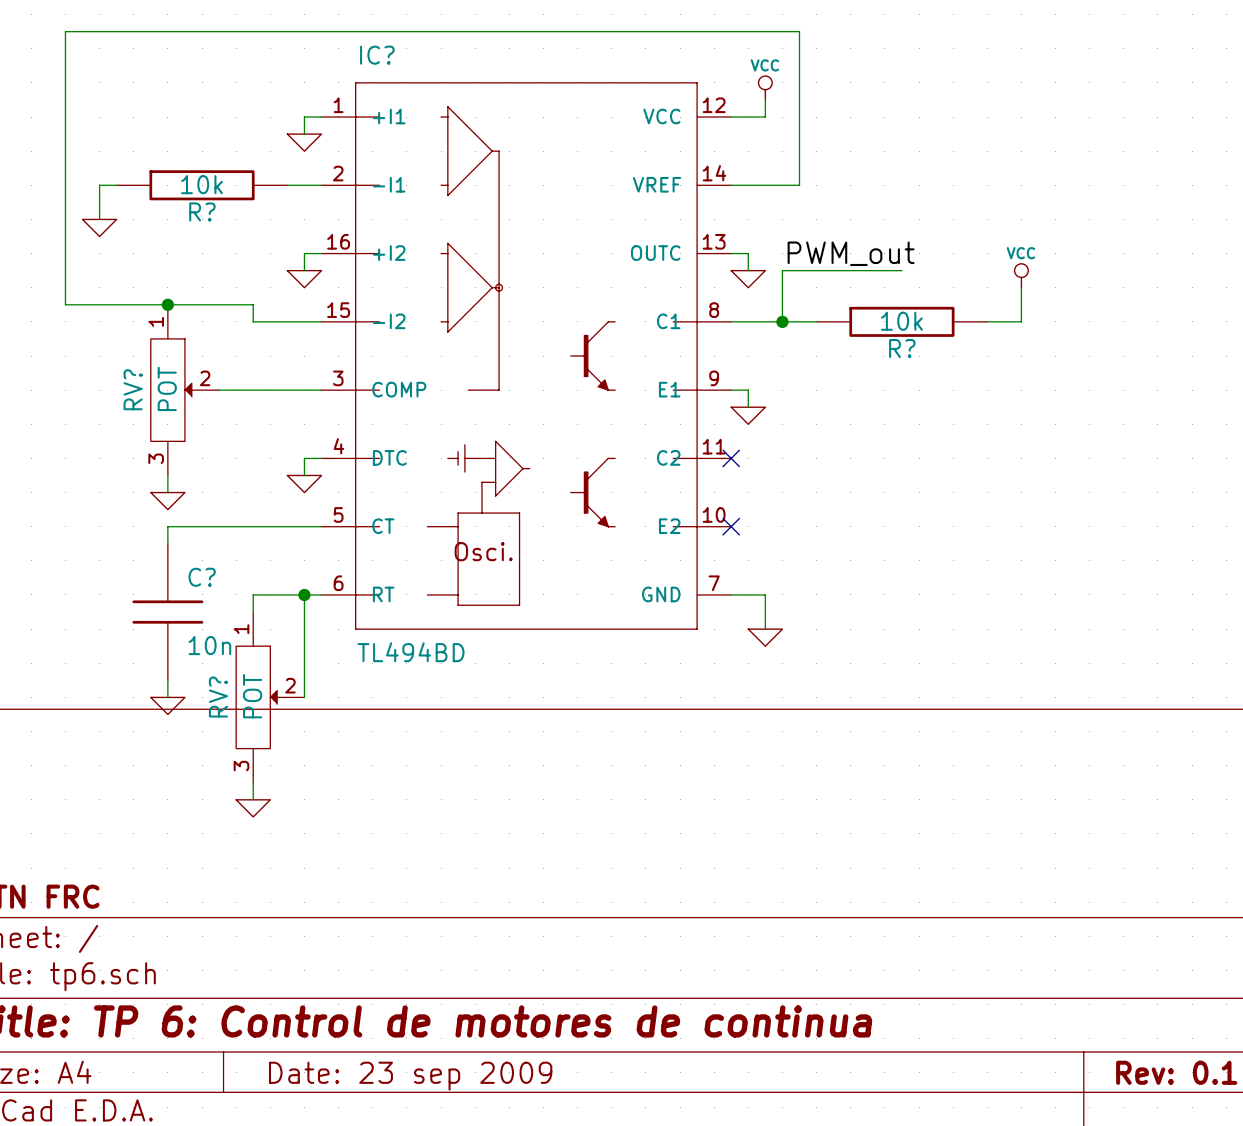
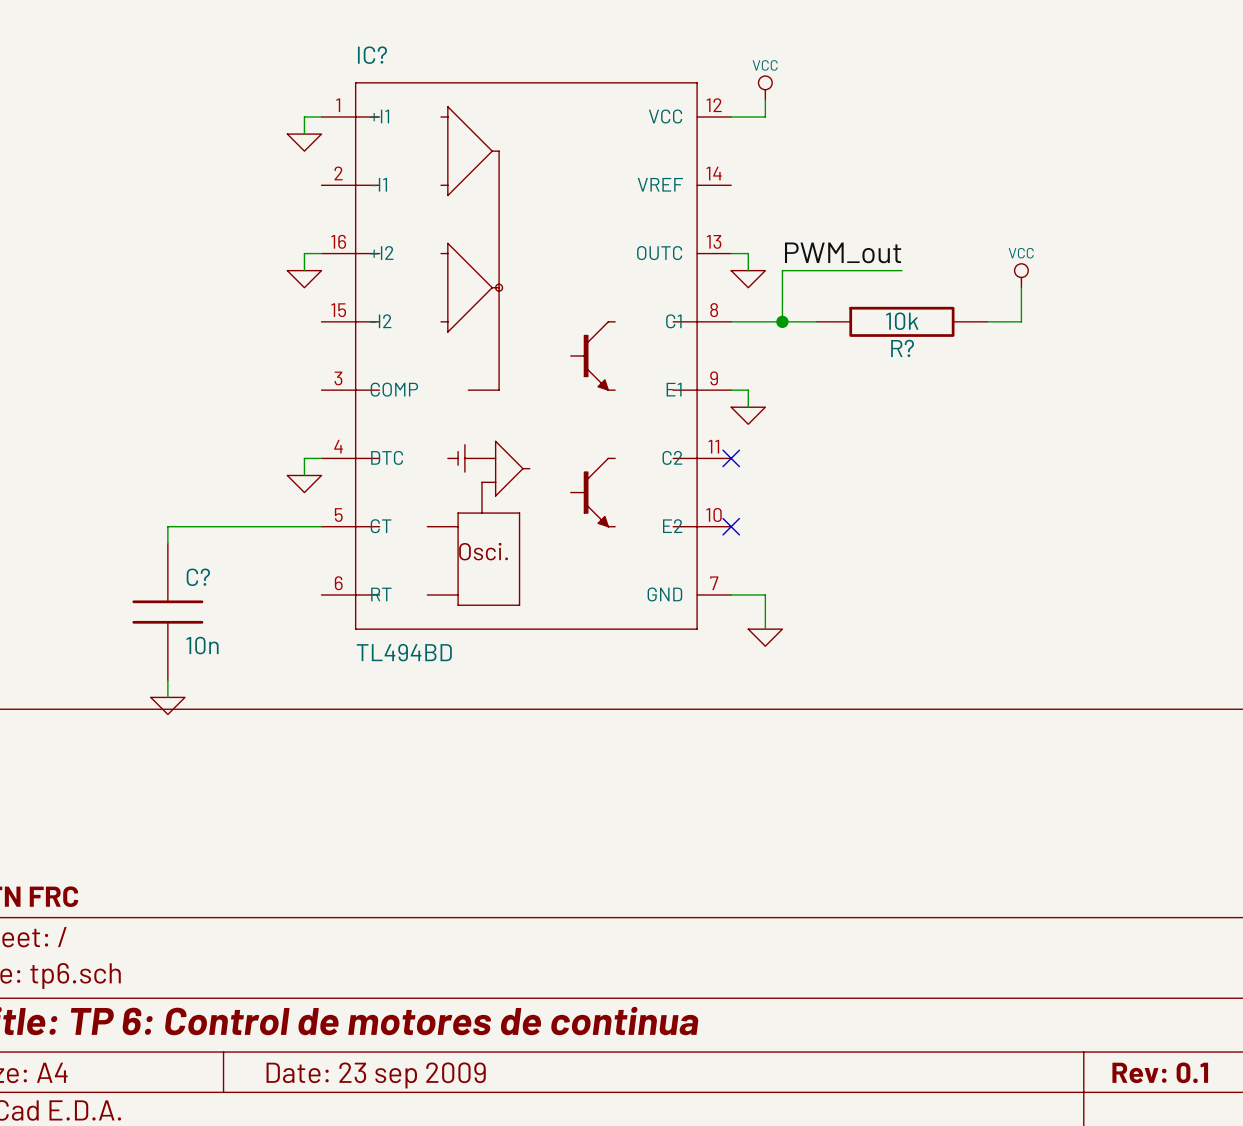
wire: (116, 185) (99, 185) (99, 219) -> none
R?: 10k (202, 185) -> none
wire: (287, 185) (321, 185) -> none
wire: (731, 185) (799, 185) (799, 31) (65, 31) (65, 304) (253, 304) (253, 321) (321, 321) -> none
power symbol: (99, 227) -> none
junction: (167, 304) -> none
RV?: POT (184, 390) -> none
wire: (219, 390) (321, 390) -> none
wire: (167, 475) (167, 492) -> none
power symbol: (167, 501) -> none
wire: (304, 594) (304, 697) -> none
junction: (304, 594) -> none
wire: (321, 594) (253, 594) (253, 612) -> none
RV?: POT (270, 697) -> none
wire: (253, 782) (253, 799) -> none
power symbol: (253, 808) -> none

